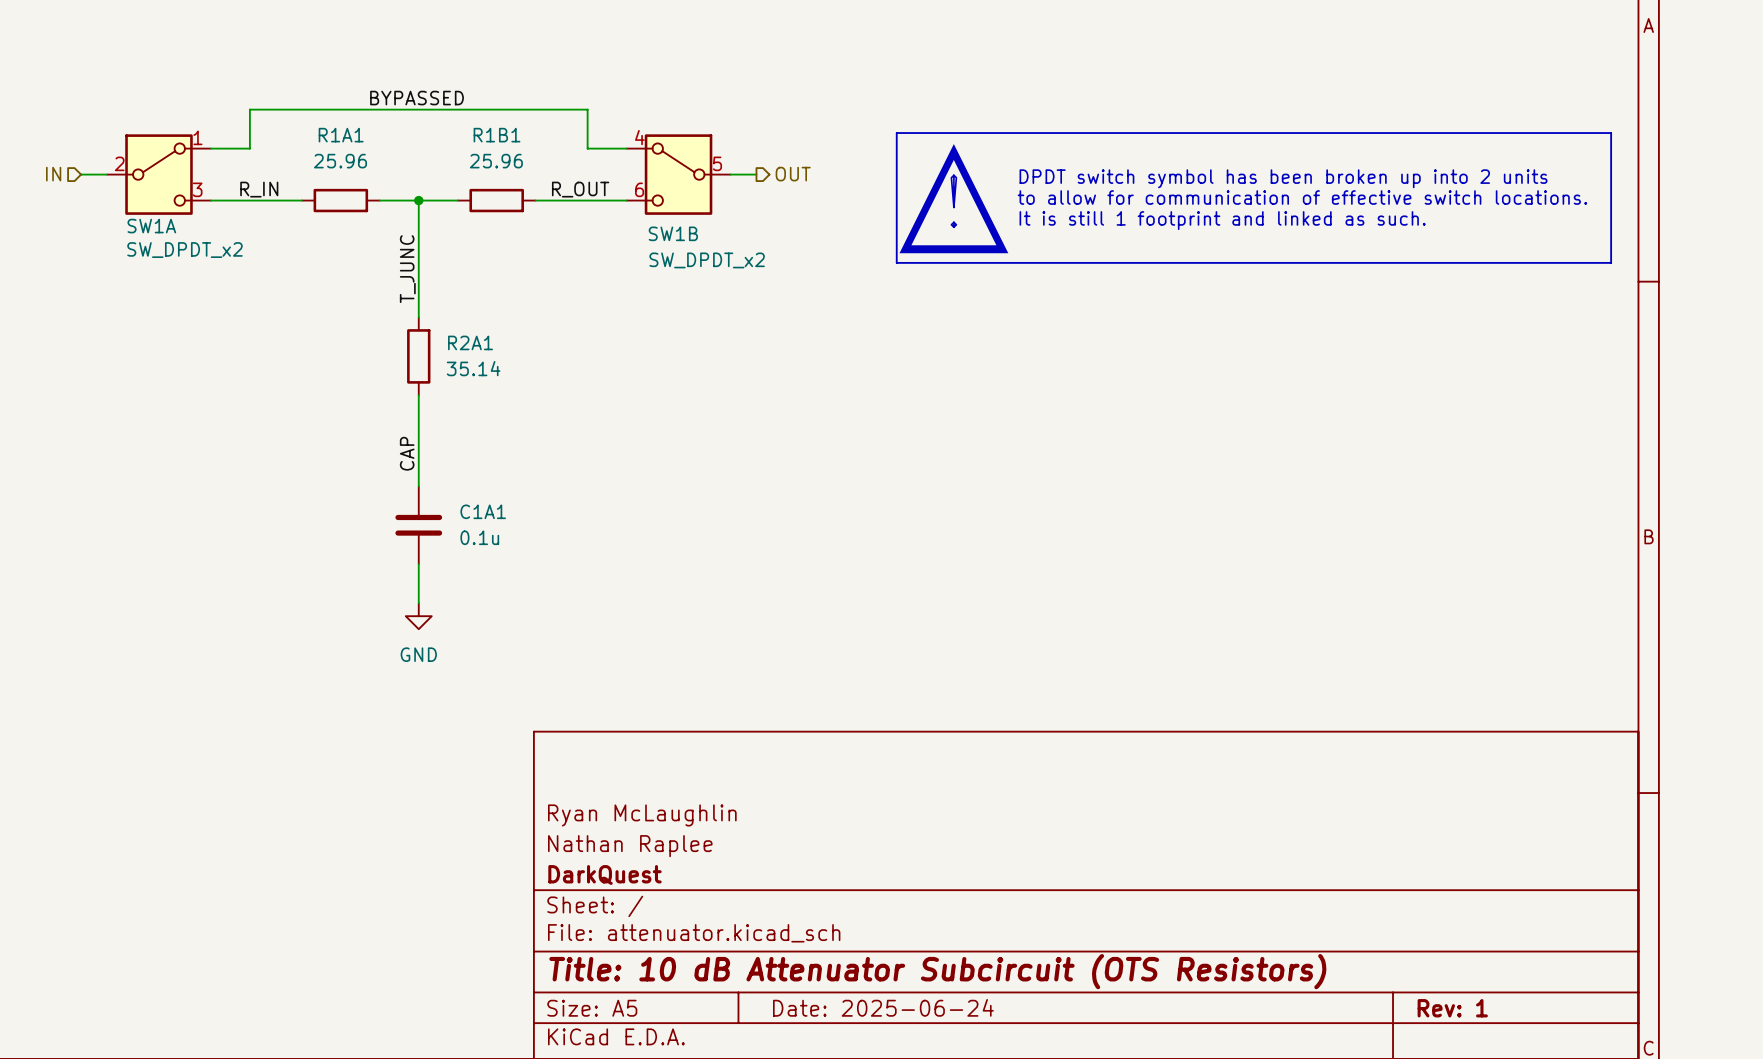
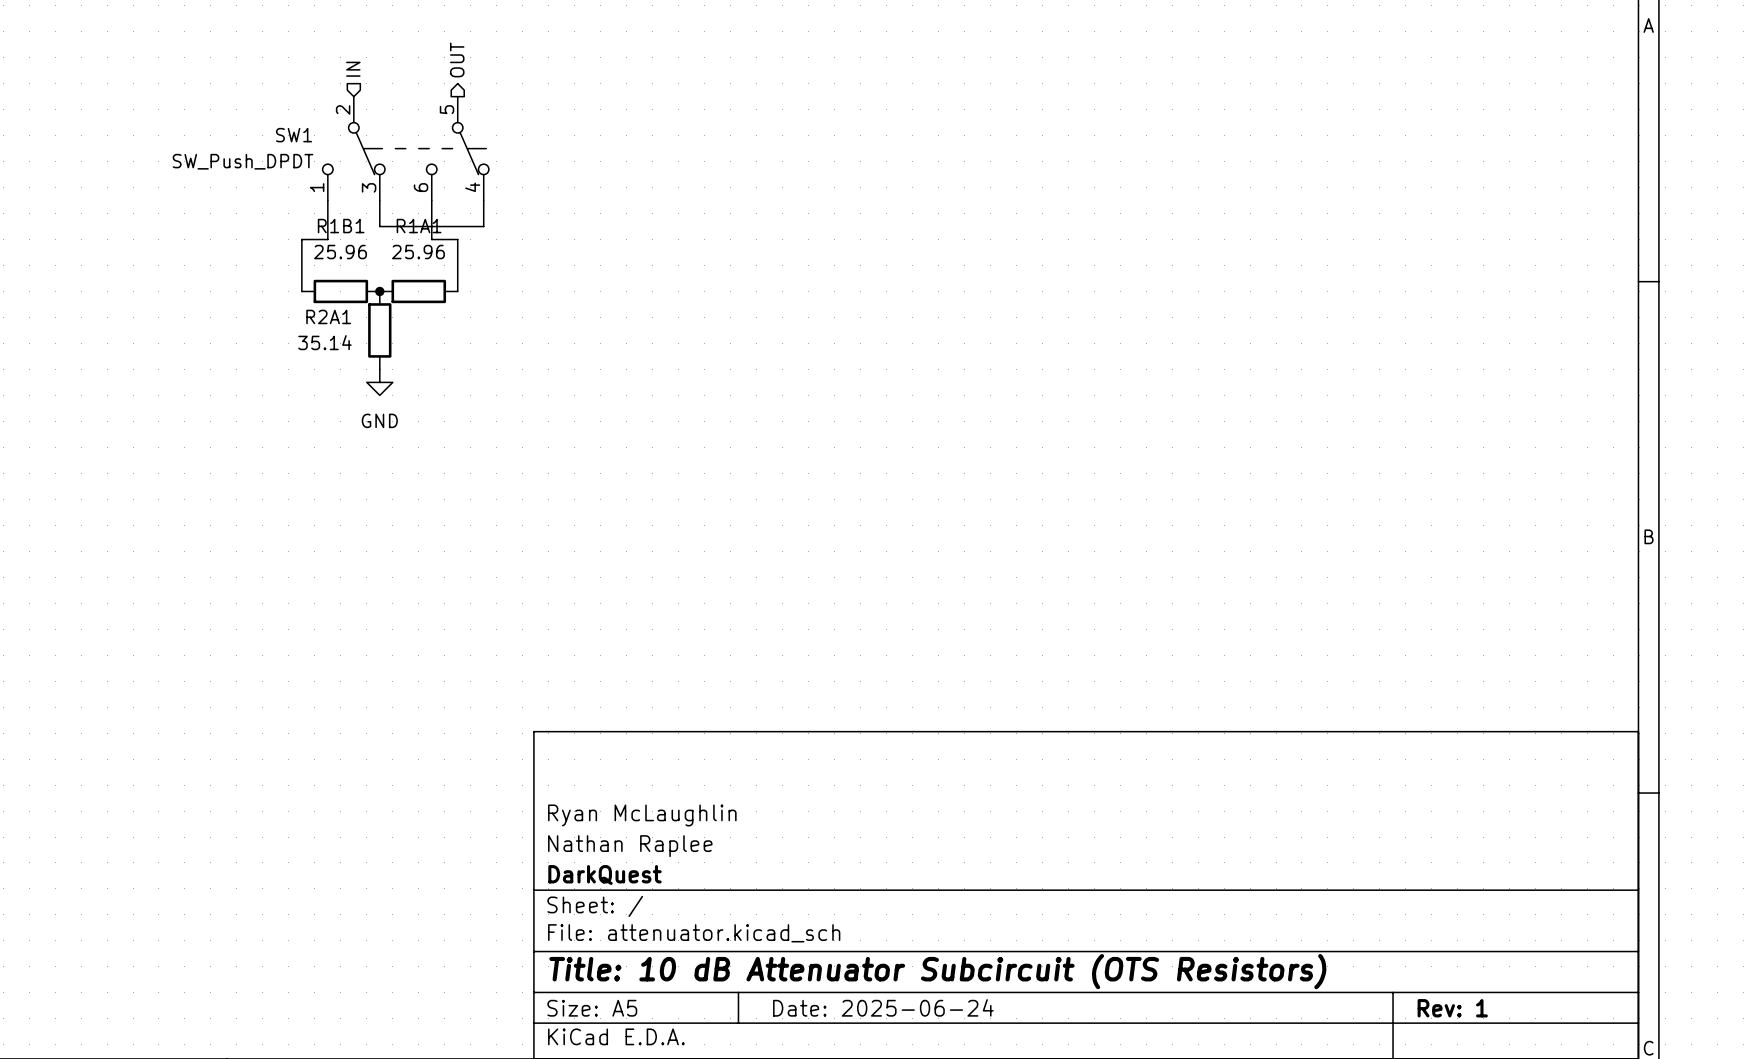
hierarchical label: none -> OUT (457, 59)
hierarchical label: none -> IN (353, 69)
label: BYPASSED (417, 98) -> none
line: (896, 133) (1611, 133) (1611, 262) (896, 262) (896, 133) -> none
wire: (210, 148) (249, 148) (249, 109) (587, 109) (587, 148) (626, 148) -> none
SW1: none -> SW_Push_DPDT (405, 148)
hierarchical label: IN (53, 174) -> none
wire: (81, 174) (107, 174) -> none
SW1A: SW_DPDT_x2 (158, 174) -> none
SW1B: SW_DPDT_x2 (678, 174) -> none
wire: (730, 174) (756, 174) -> none
hierarchical label: OUT (793, 174) -> none
text: DPDT switch symbol has been broken up into 2 units (1283, 178) -> none
label: R_IN (259, 189) -> none
label: R_OUT (580, 189) -> none
text: to allow for communication of effective switch locations. (1302, 197) -> none
text: △ (953, 198) -> none
wire: (210, 200) (301, 200) -> none
wire: none -> (327, 200) (327, 239) (301, 239) (301, 291)
R1A1 position: (340, 200) -> (418, 291)
wire: (379, 200) (457, 200) -> (379, 200) (379, 226) (483, 226) (483, 200)
wire: (418, 200) (418, 317) -> none
junction: (418, 200) -> none
wire: none -> (431, 200) (431, 239) (457, 239) (457, 291)
R1B1 position: (496, 200) -> (340, 291)
wire: (535, 200) (626, 200) -> none
text: ! (953, 201) -> none
text: It is still 1 footprint and linked as such. (1222, 220) -> none
label: T_JUNC (407, 269) -> none
junction: none -> (379, 291)
R2A1 name position: R2A1 (470, 342) -> R2A1 (328, 316)
R2A1 position: (418, 356) -> (379, 330)
R2A1 value position: 35.14 (473, 368) -> 35.14 (324, 342)
wire: (418, 395) (418, 486) -> none
label: CAP (407, 453) -> none
C1A1: 0.1u (418, 525) -> none
wire: (418, 564) (418, 603) -> none
power symbol position: GND (418, 616) -> GND (379, 382)

